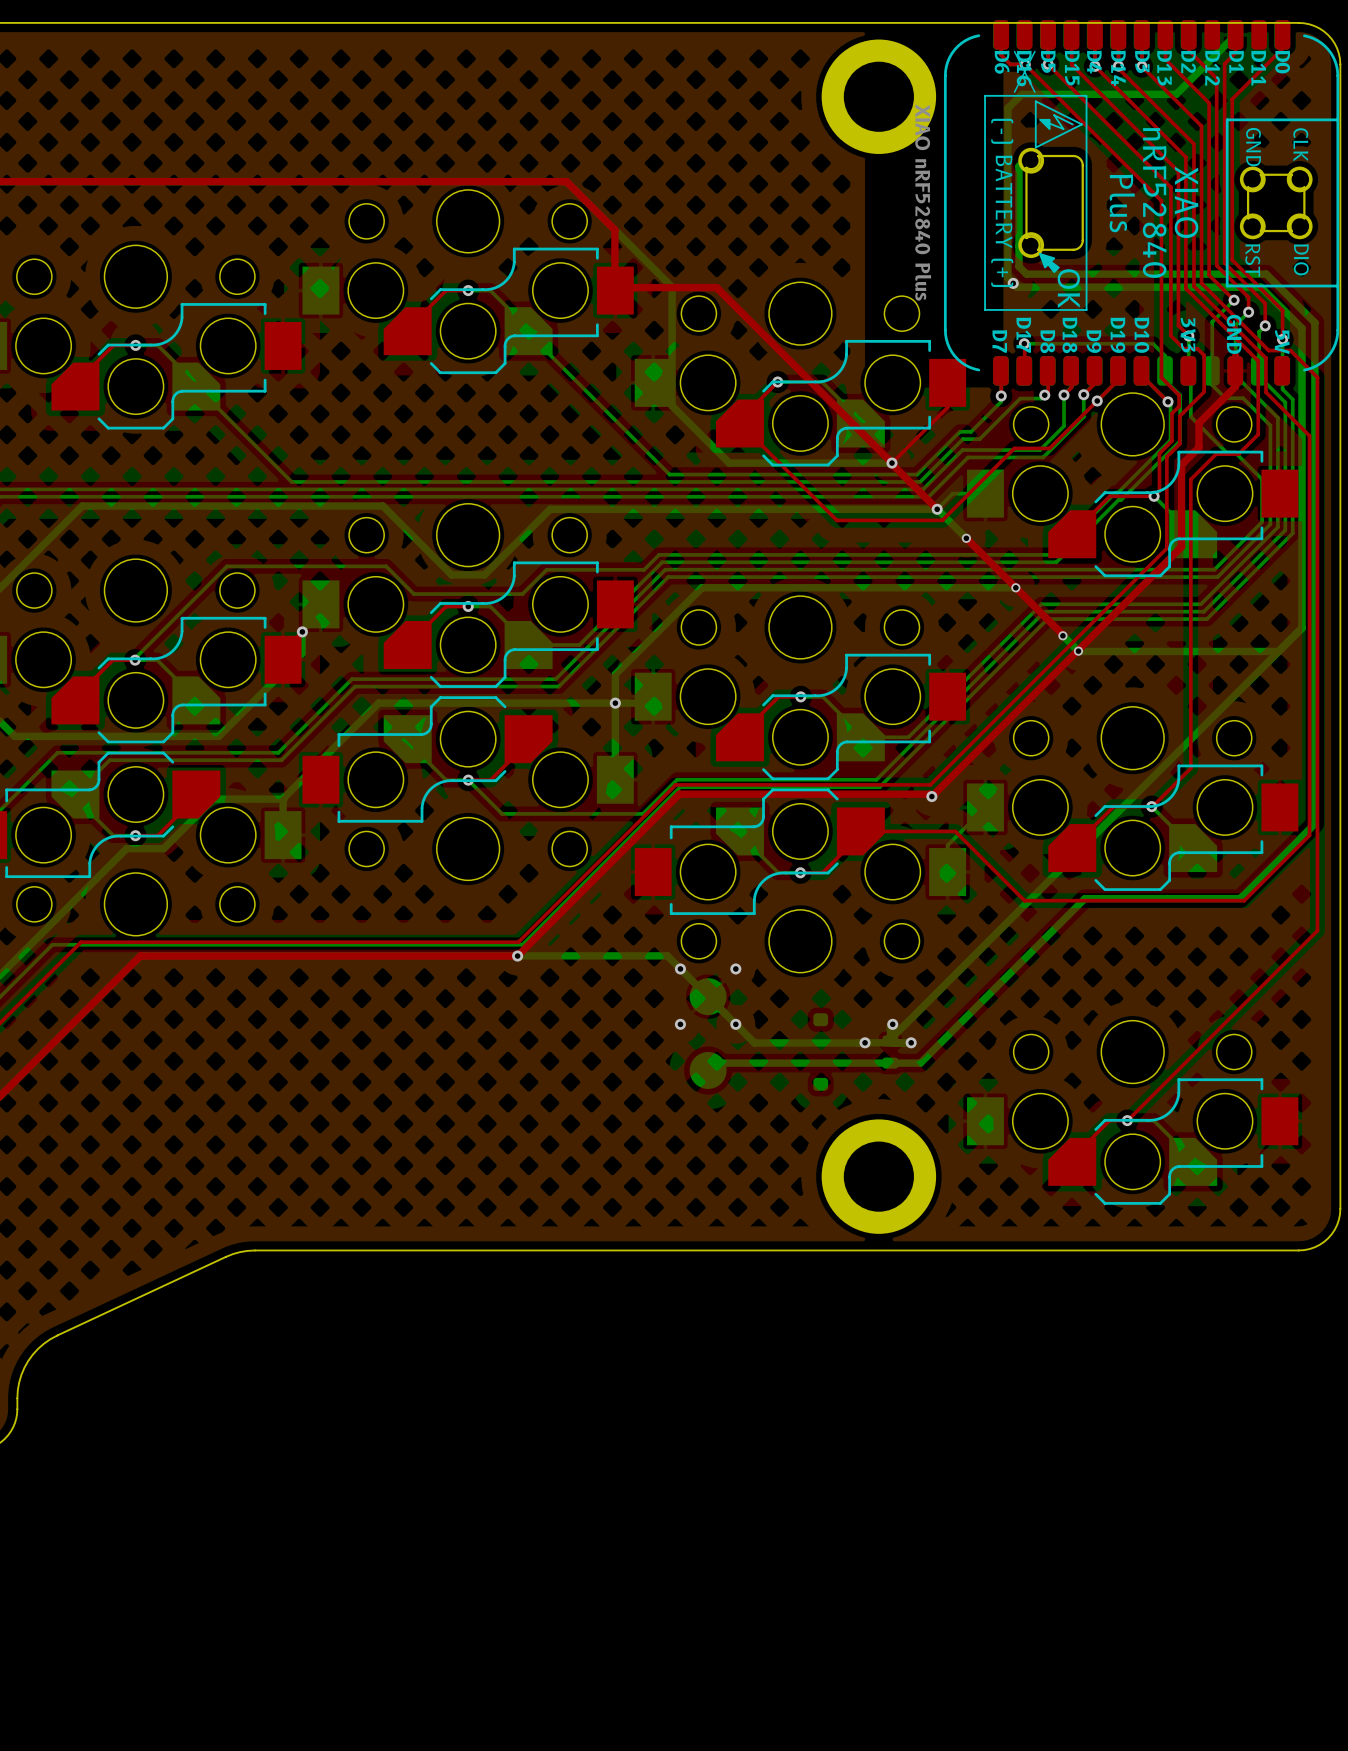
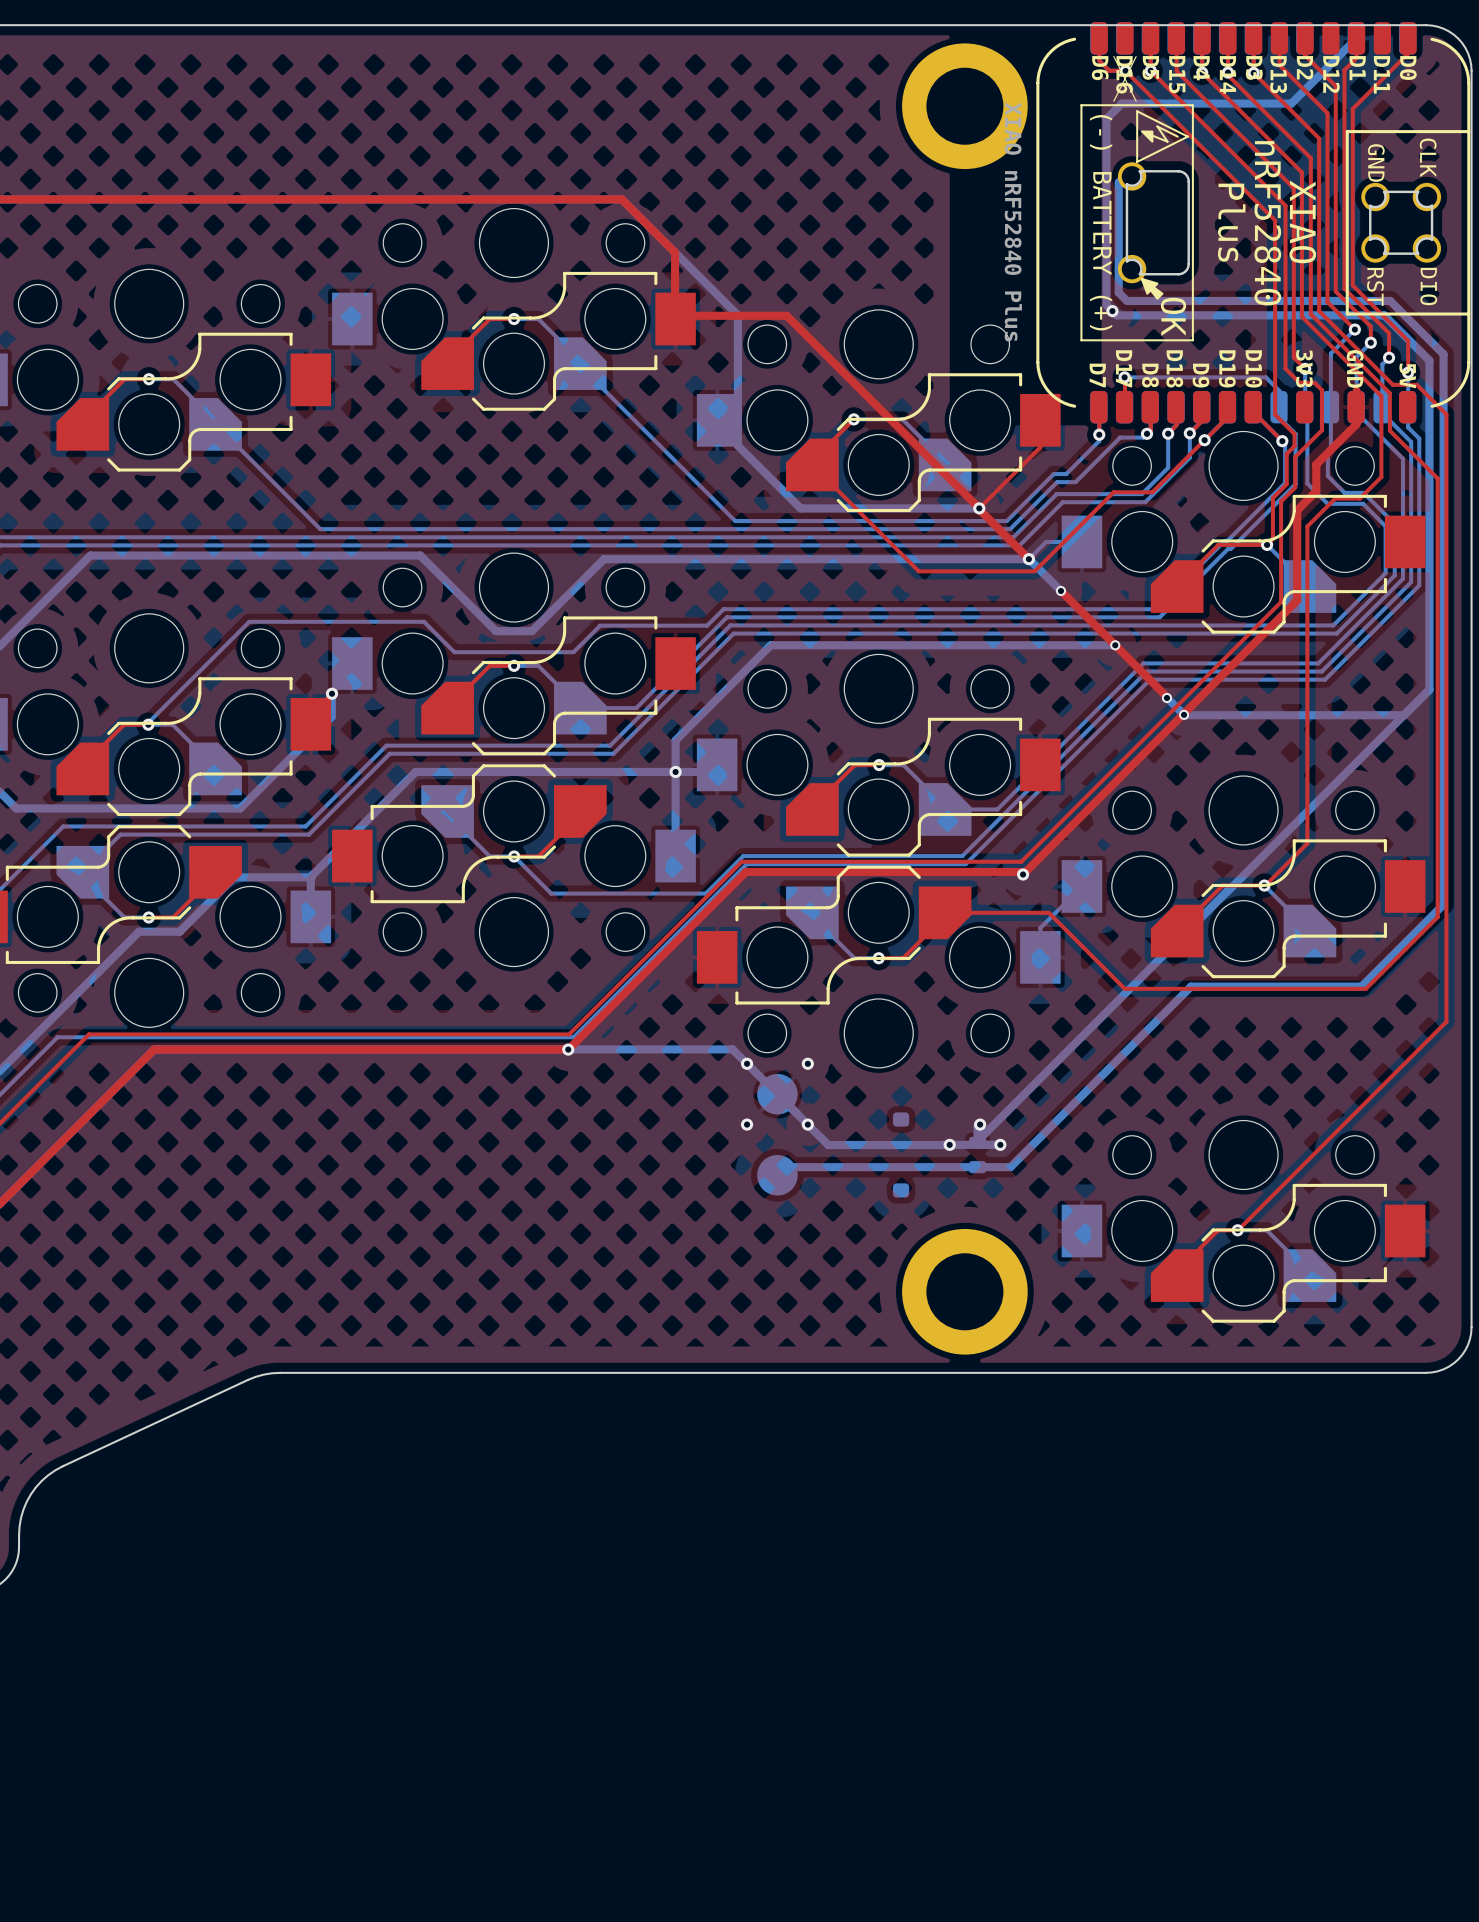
bottom track: (1212, 385) (1225, 398) (1243, 398) (1270, 425) (1270, 477) -> (1330, 422) (1330, 451) (1327, 454) (1327, 476) (1344, 492) (1363, 492) (1394, 523)
bottom track: (1190, 416) (1226, 452) (1235, 452) (1241, 458) -> (1307, 457) (1307, 483) (1327, 503) (1363, 503)

